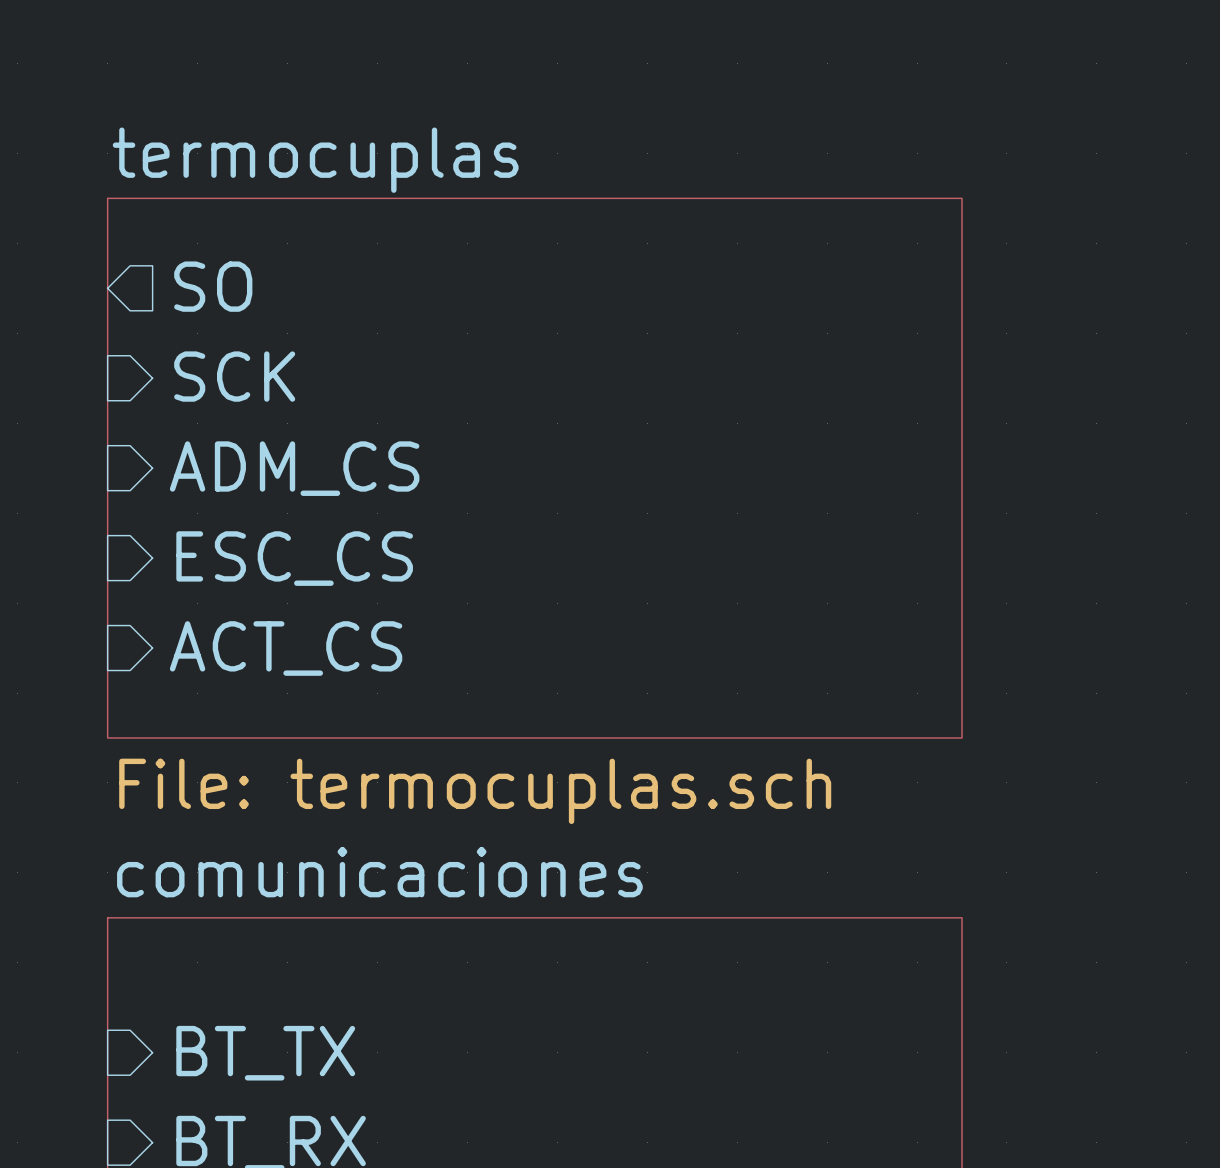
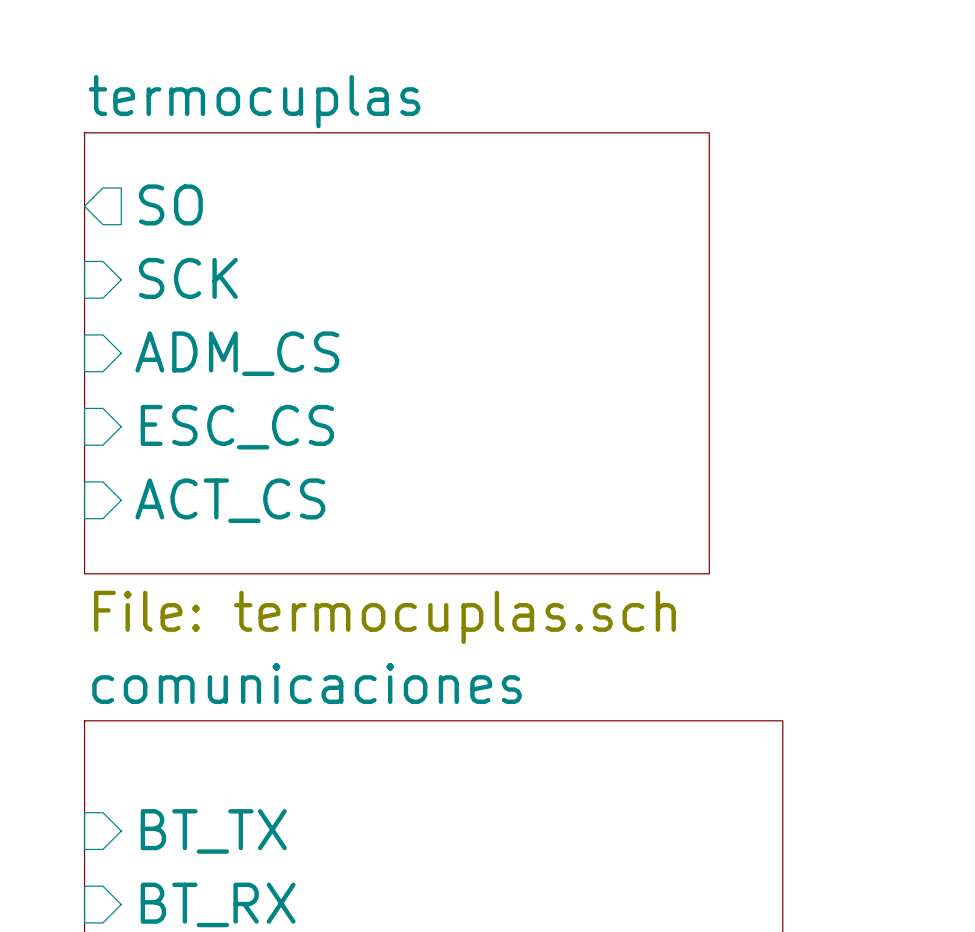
sheet termocuplas: none -> File: termocuplas.sch (396, 353)
sheet termocuplas: File: termocuplas.sch (534, 468) -> none

